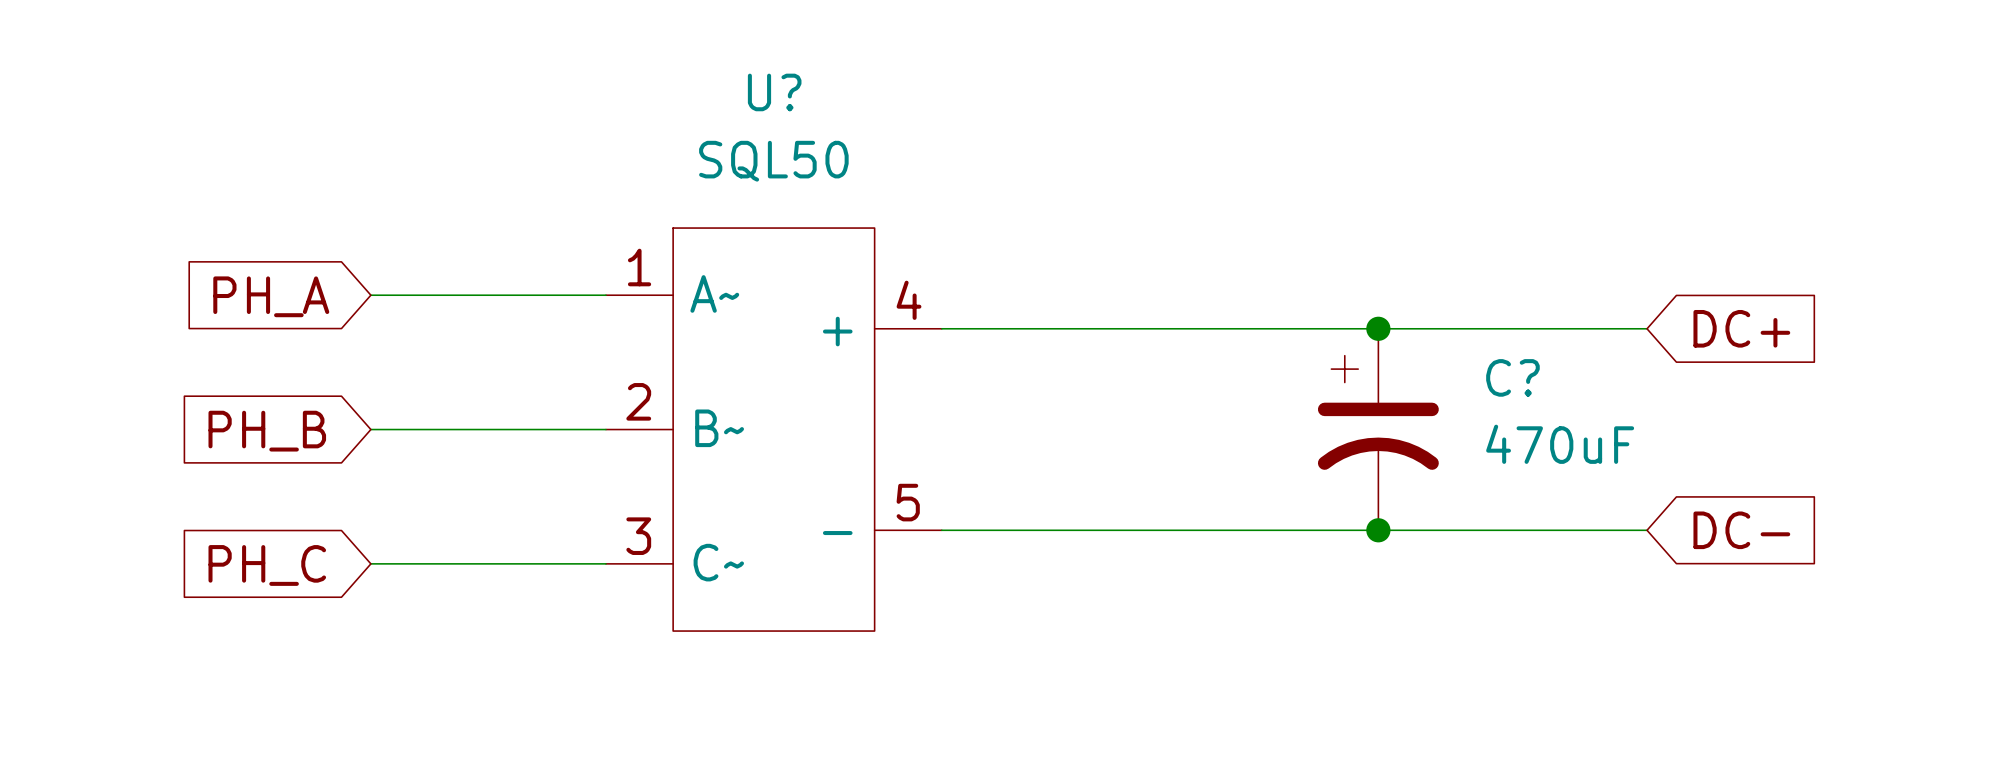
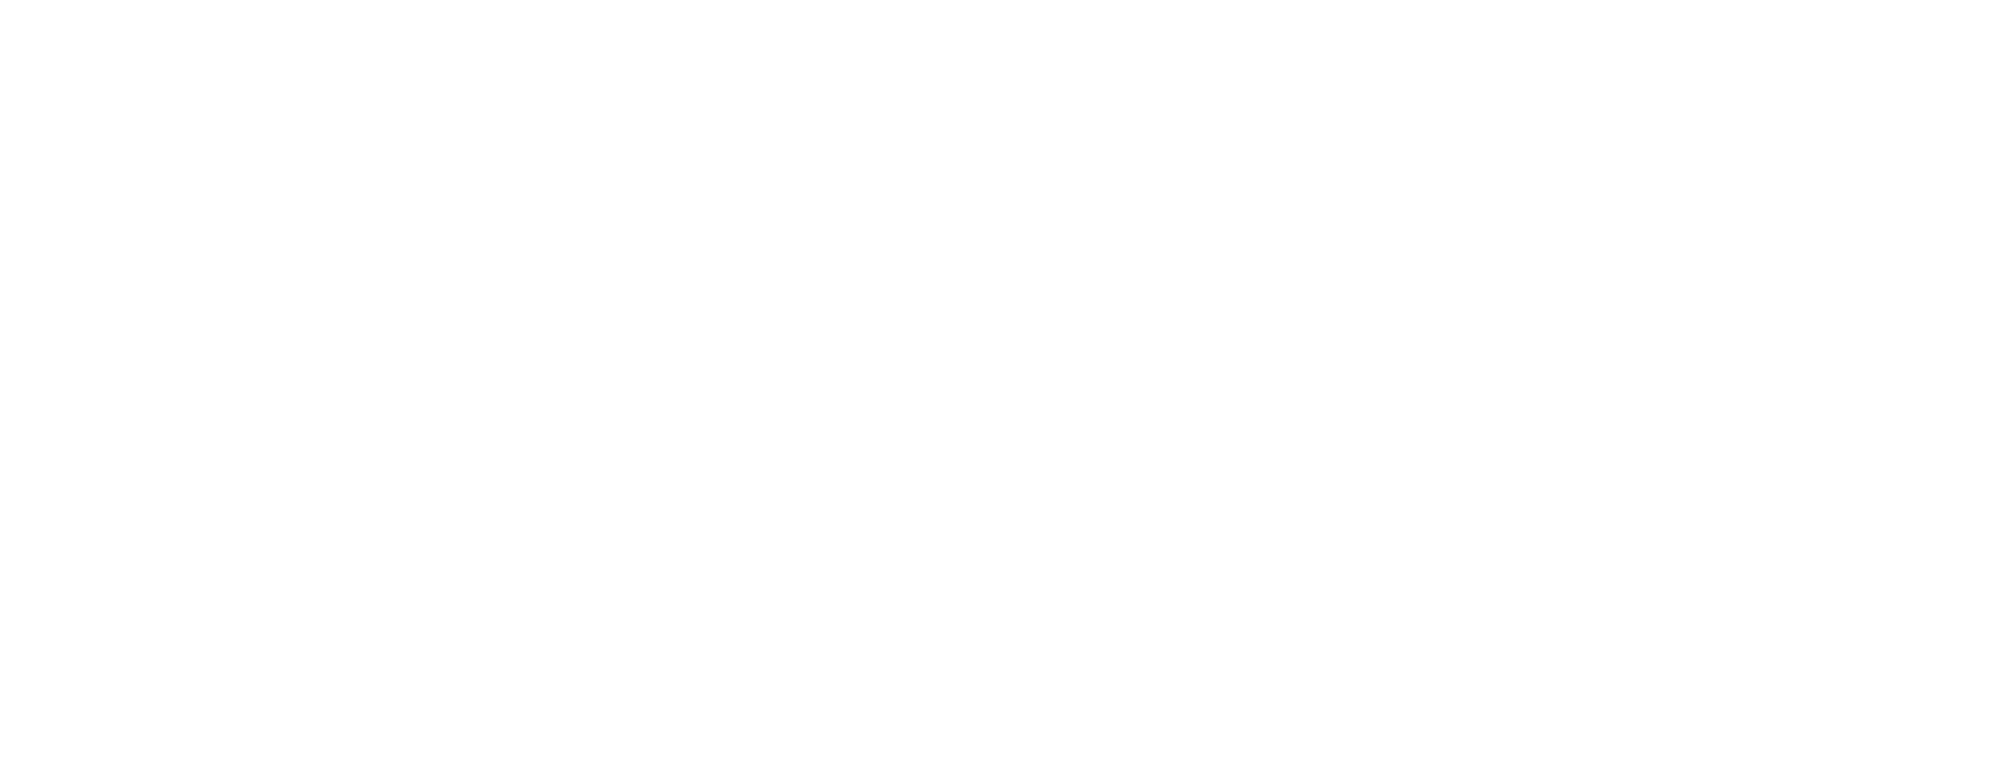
wire: (370, 295) (605, 295) -> none
global label: PH_A (271, 296) -> none
wire: (941, 328) (1647, 328) -> none
junction: (1378, 328) -> none
global label: DC+ (1741, 328) -> none
wire: (370, 429) (605, 429) -> none
U?: SQL50 (773, 429) -> none
C?: 470uF (1378, 429) -> none
global label: PH_B (267, 431) -> none
wire: (941, 530) (1647, 530) -> none
junction: (1378, 530) -> none
global label: DC- (1741, 530) -> none
wire: (370, 563) (605, 563) -> none
global label: PH_C (267, 565) -> none

